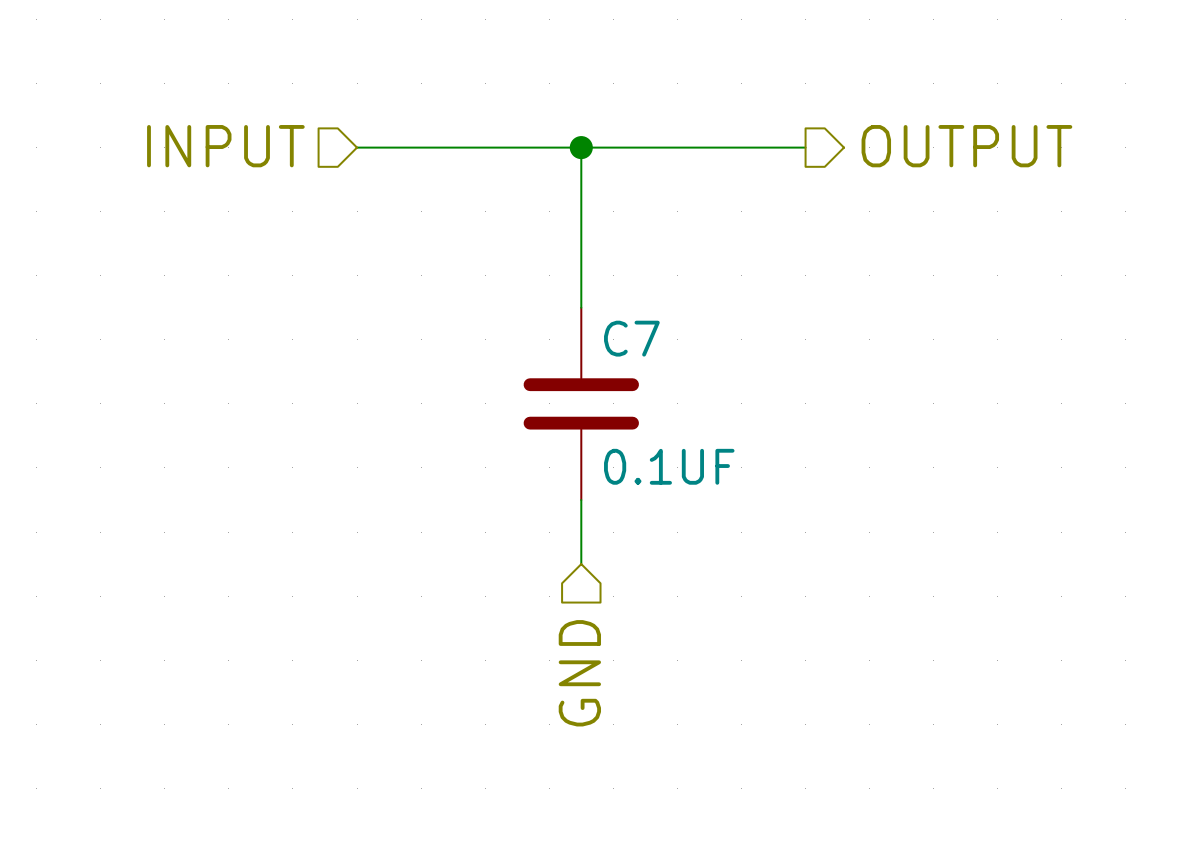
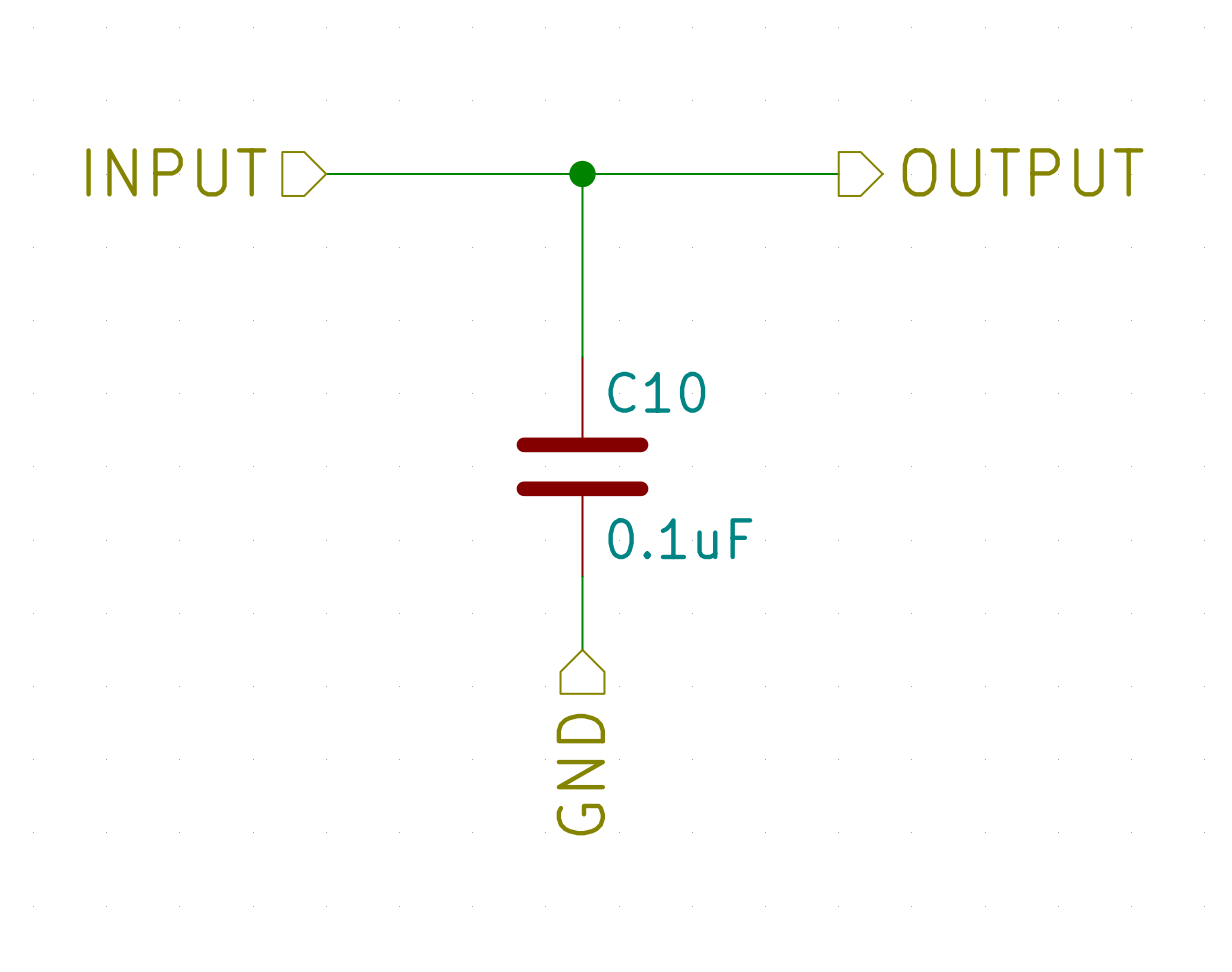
C7 name: C7 (631, 338) -> C10 (656, 392)
C7 value: 0.1UF (669, 466) -> 0.1uF (680, 538)

